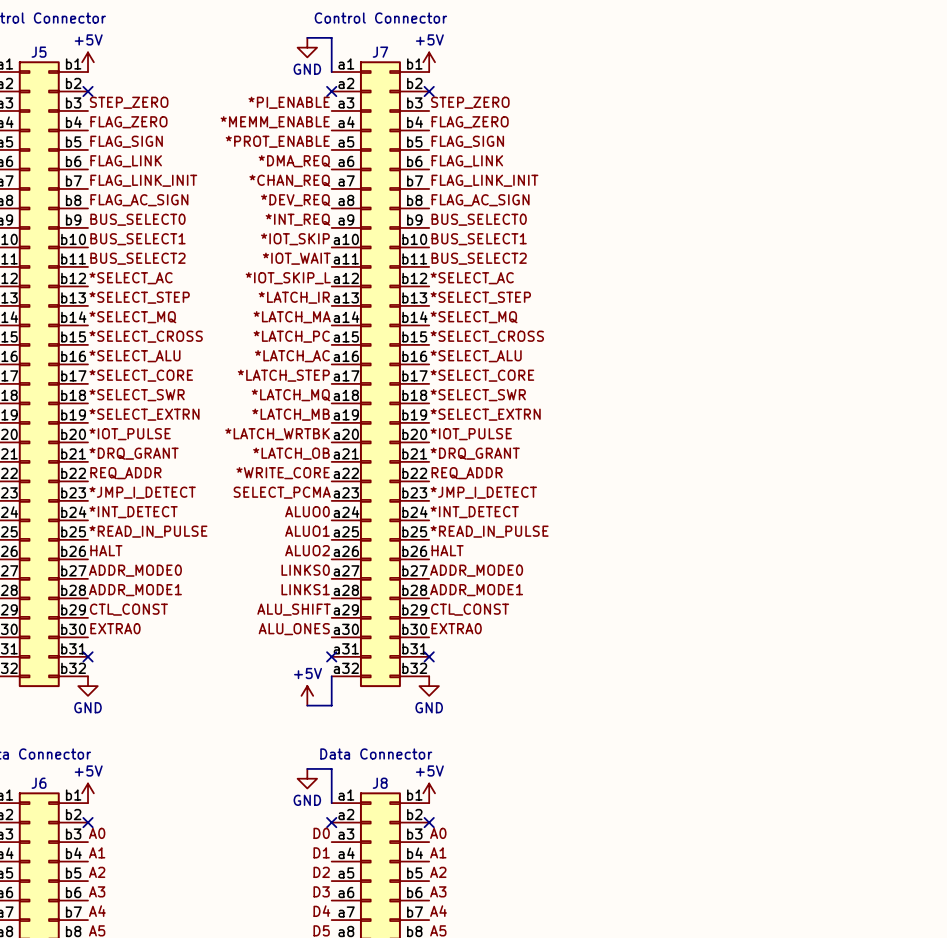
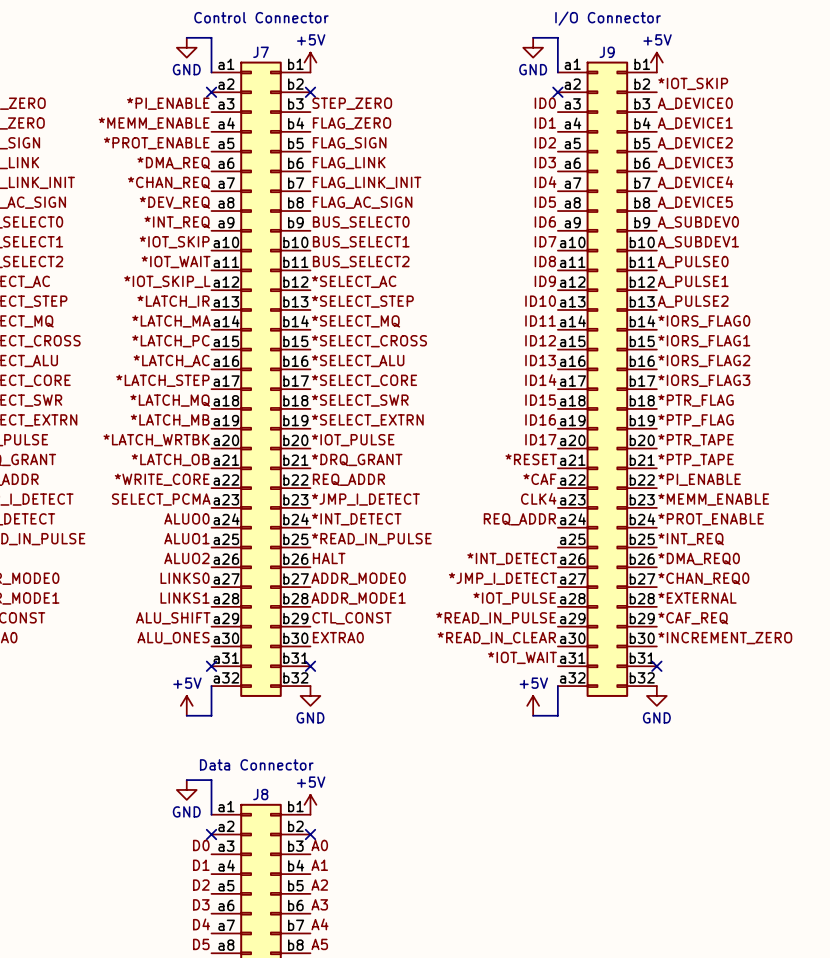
wire: none -> (533, 37) (557, 37) (557, 72)
power symbol: none -> GND (533, 47)
power symbol: none -> +5V (656, 62)
label: none -> *IOT_SKIP (693, 83)
no-connect mark: none -> (557, 92)
label: none -> ID0 (545, 103)
label: none -> A_DEVICE0 (695, 103)
label: none -> ID1 (545, 123)
label: none -> A_DEVICE1 (695, 123)
label: none -> ID2 (545, 142)
label: none -> A_DEVICE2 (695, 143)
label: none -> ID3 (545, 162)
label: none -> A_DEVICE3 (695, 163)
label: none -> ID4 (545, 182)
label: none -> A_DEVICE4 (695, 182)
label: none -> ID5 (545, 202)
label: none -> A_DEVICE5 (695, 202)
label: none -> ID6 (545, 221)
label: none -> A_SUBDEV0 (698, 222)
label: none -> ID7 (545, 241)
label: none -> A_SUBDEV1 (698, 242)
label: none -> ID8 (545, 261)
label: none -> A_PULSE0 (693, 262)
label: none -> ID9 (545, 281)
label: none -> A_PULSE1 (693, 281)
label: none -> ID10 (540, 301)
label: none -> A_PULSE2 (693, 301)
label: none -> ID11 (540, 320)
label: none -> *IORS_FLAG0 (704, 321)
label: none -> ID12 (540, 340)
label: none -> *IORS_FLAG1 (704, 341)
label: none -> ID13 (540, 360)
label: none -> *IORS_FLAG2 (704, 361)
J9: none -> I/O Connector (607, 379)
label: none -> ID14 (540, 380)
label: none -> *IORS_FLAG3 (704, 380)
label: none -> ID15 (540, 400)
label: none -> *PTR_FLAG (696, 400)
label: none -> ID16 (540, 419)
label: none -> *PTP_FLAG (696, 420)
label: none -> ID17 (540, 439)
label: none -> *PTR_TAPE (696, 440)
label: none -> *RESET (531, 459)
label: none -> *PTP_TAPE (696, 459)
label: none -> *CAF (539, 479)
label: none -> *PI_ENABLE (699, 479)
label: none -> CLK4 (538, 498)
label: none -> *MEMM_ENABLE (713, 499)
label: none -> REQ_ADDR (519, 519)
label: none -> *PROT_ENABLE (711, 519)
label: none -> *INT_REQ (691, 539)
label: none -> *INT_DETECT (512, 558)
label: none -> *DMA_REQ0 (699, 558)
label: none -> *JMP_I_DETECT (502, 578)
label: none -> *CHAN_REQ0 (703, 578)
label: none -> *EXTERNAL (697, 598)
label: none -> *IOT_PULSE (514, 598)
label: none -> *READ_IN_PULSE (496, 618)
label: none -> *CAF_REQ (693, 618)
label: none -> *READ_IN_CLEAR (496, 638)
label: none -> *INCREMENT_ZERO (725, 638)
label: none -> *IOT_WAIT (522, 657)
no-connect mark: none -> (656, 666)
wire: none -> (557, 686) (557, 715) (533, 715)
power symbol: none -> GND (656, 695)
power symbol: none -> +5V (533, 705)

